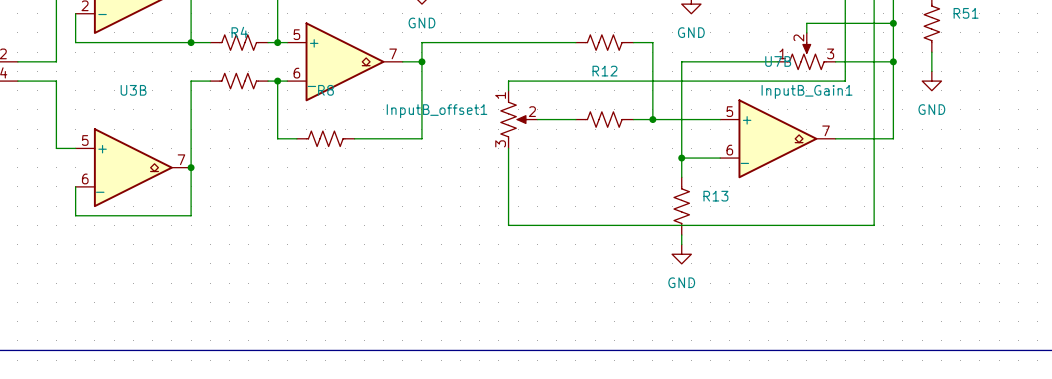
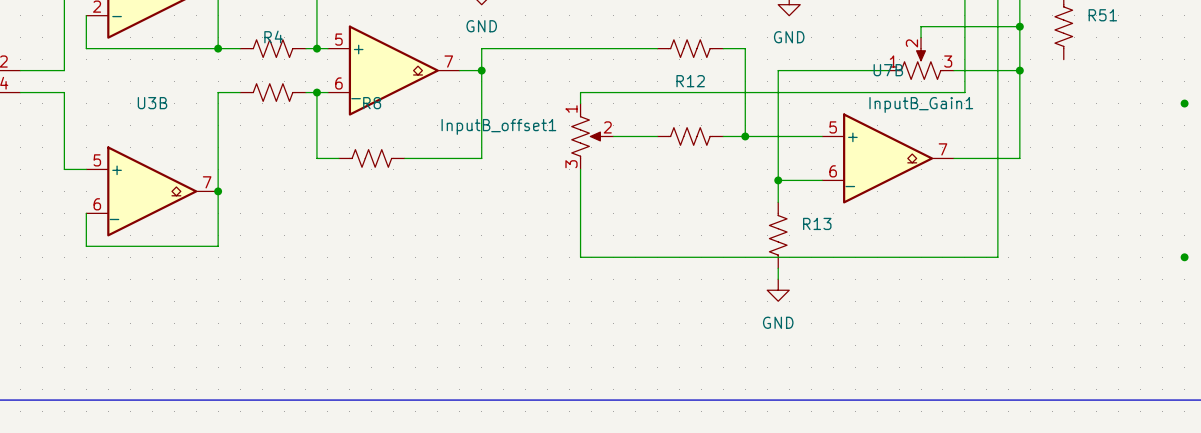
wire: (931, 52) (931, 71) -> none
power symbol: GND (931, 81) -> none
junction: none -> (1184, 103)
junction: none -> (1184, 257)

